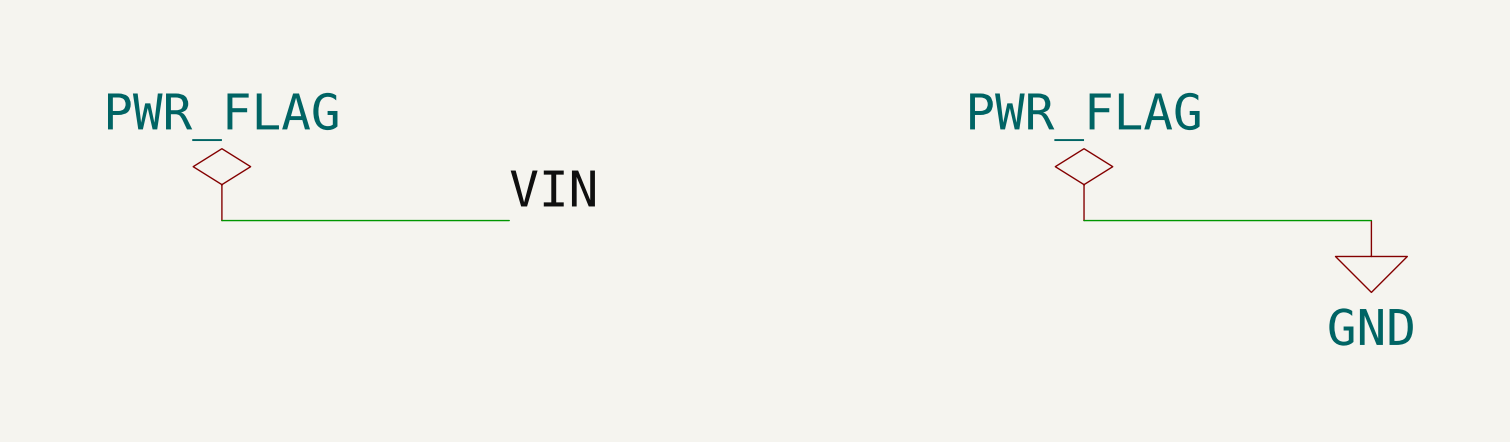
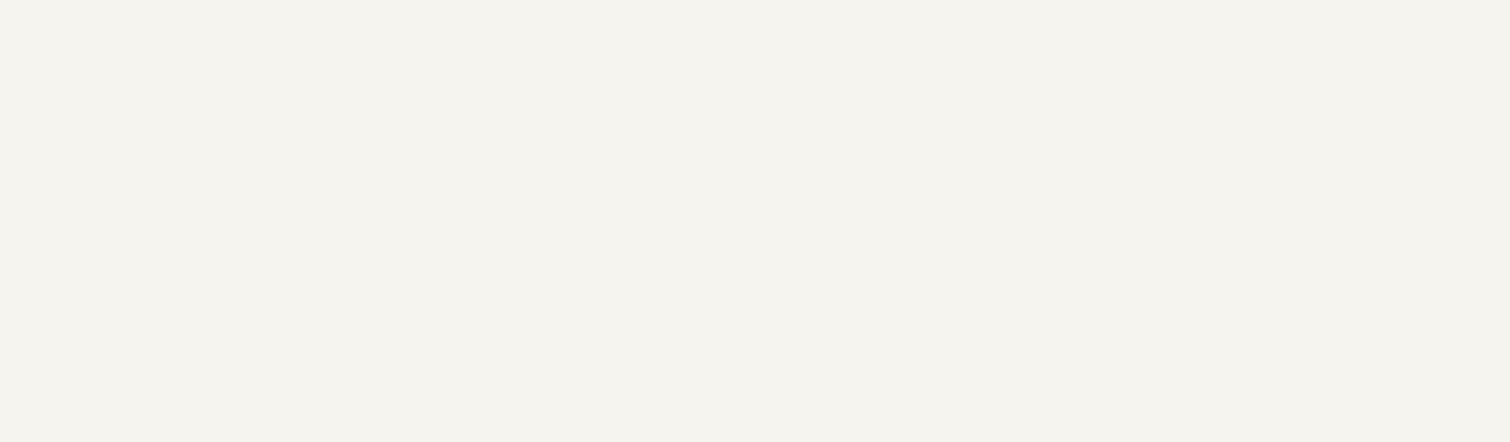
power symbol: PWR_FLAG (221, 184) -> none
power symbol: PWR_FLAG (1084, 184) -> none
label: VIN (552, 188) -> none
wire: (221, 220) (509, 220) -> none
wire: (1084, 220) (1371, 220) -> none
power symbol: GND (1371, 256) -> none

